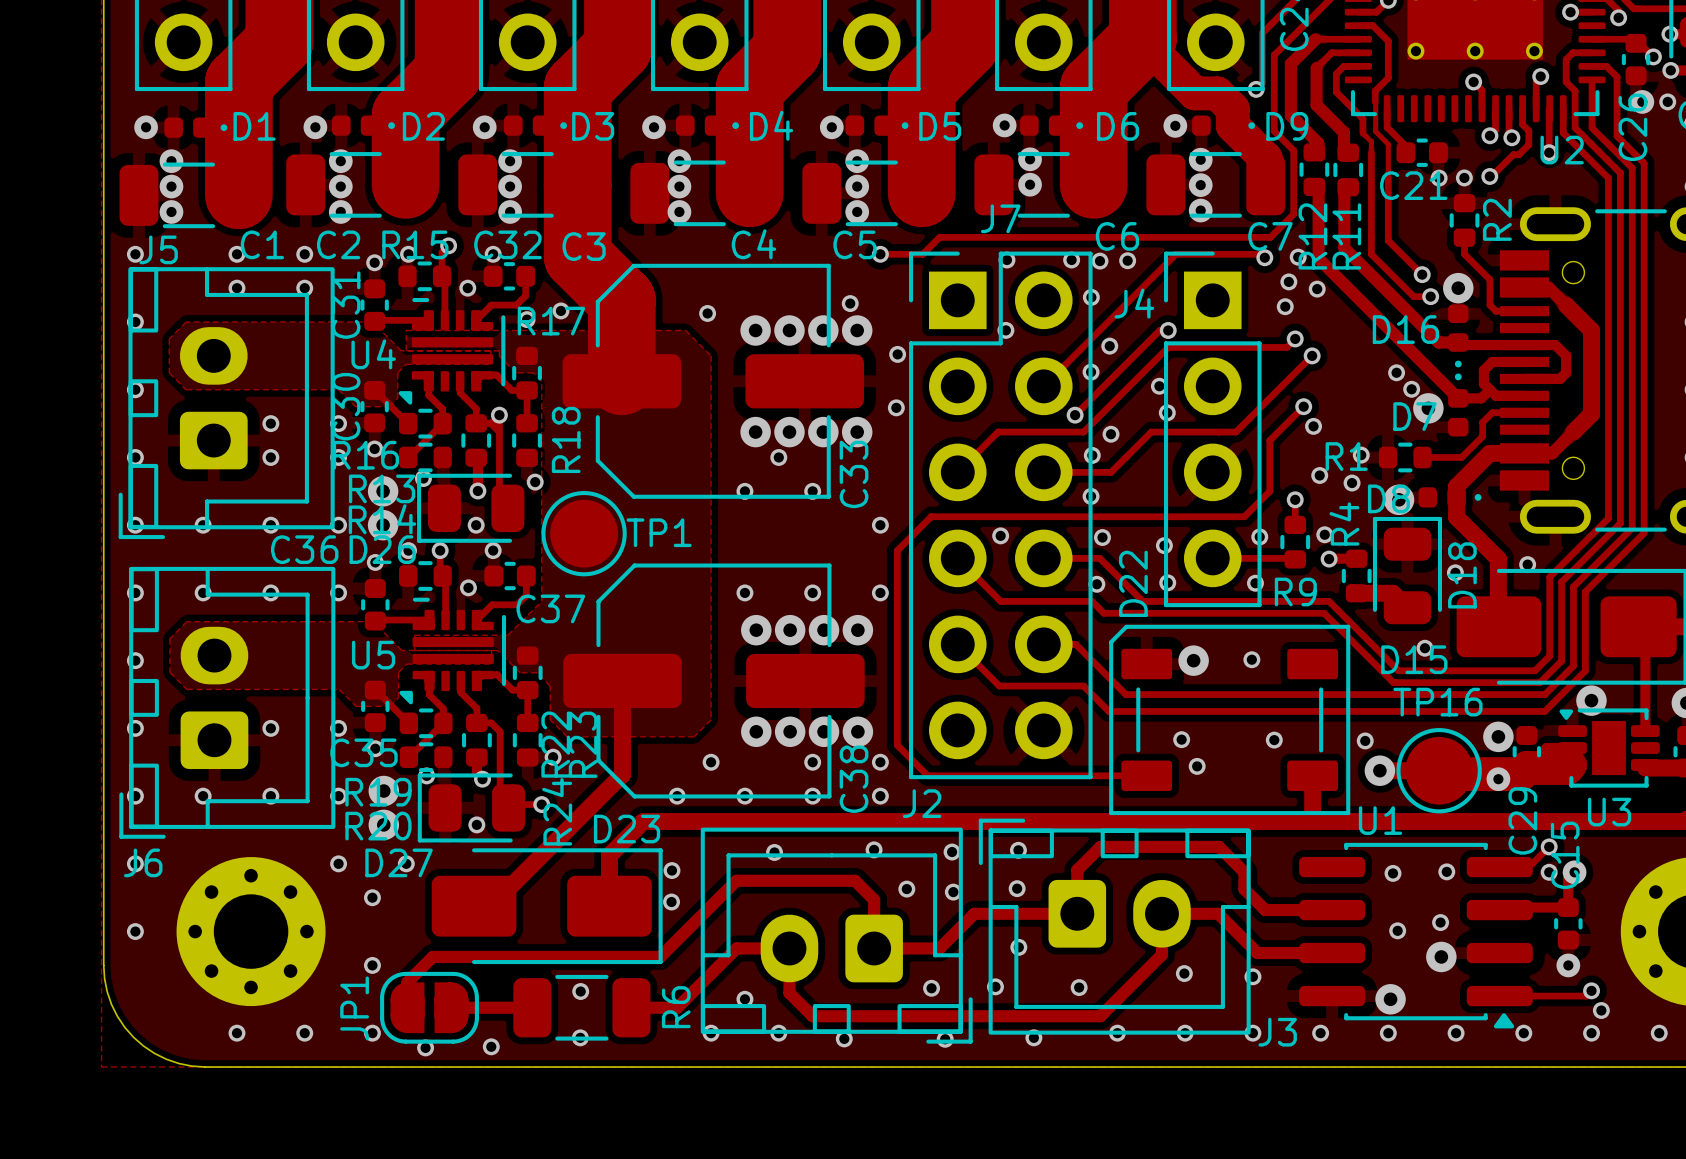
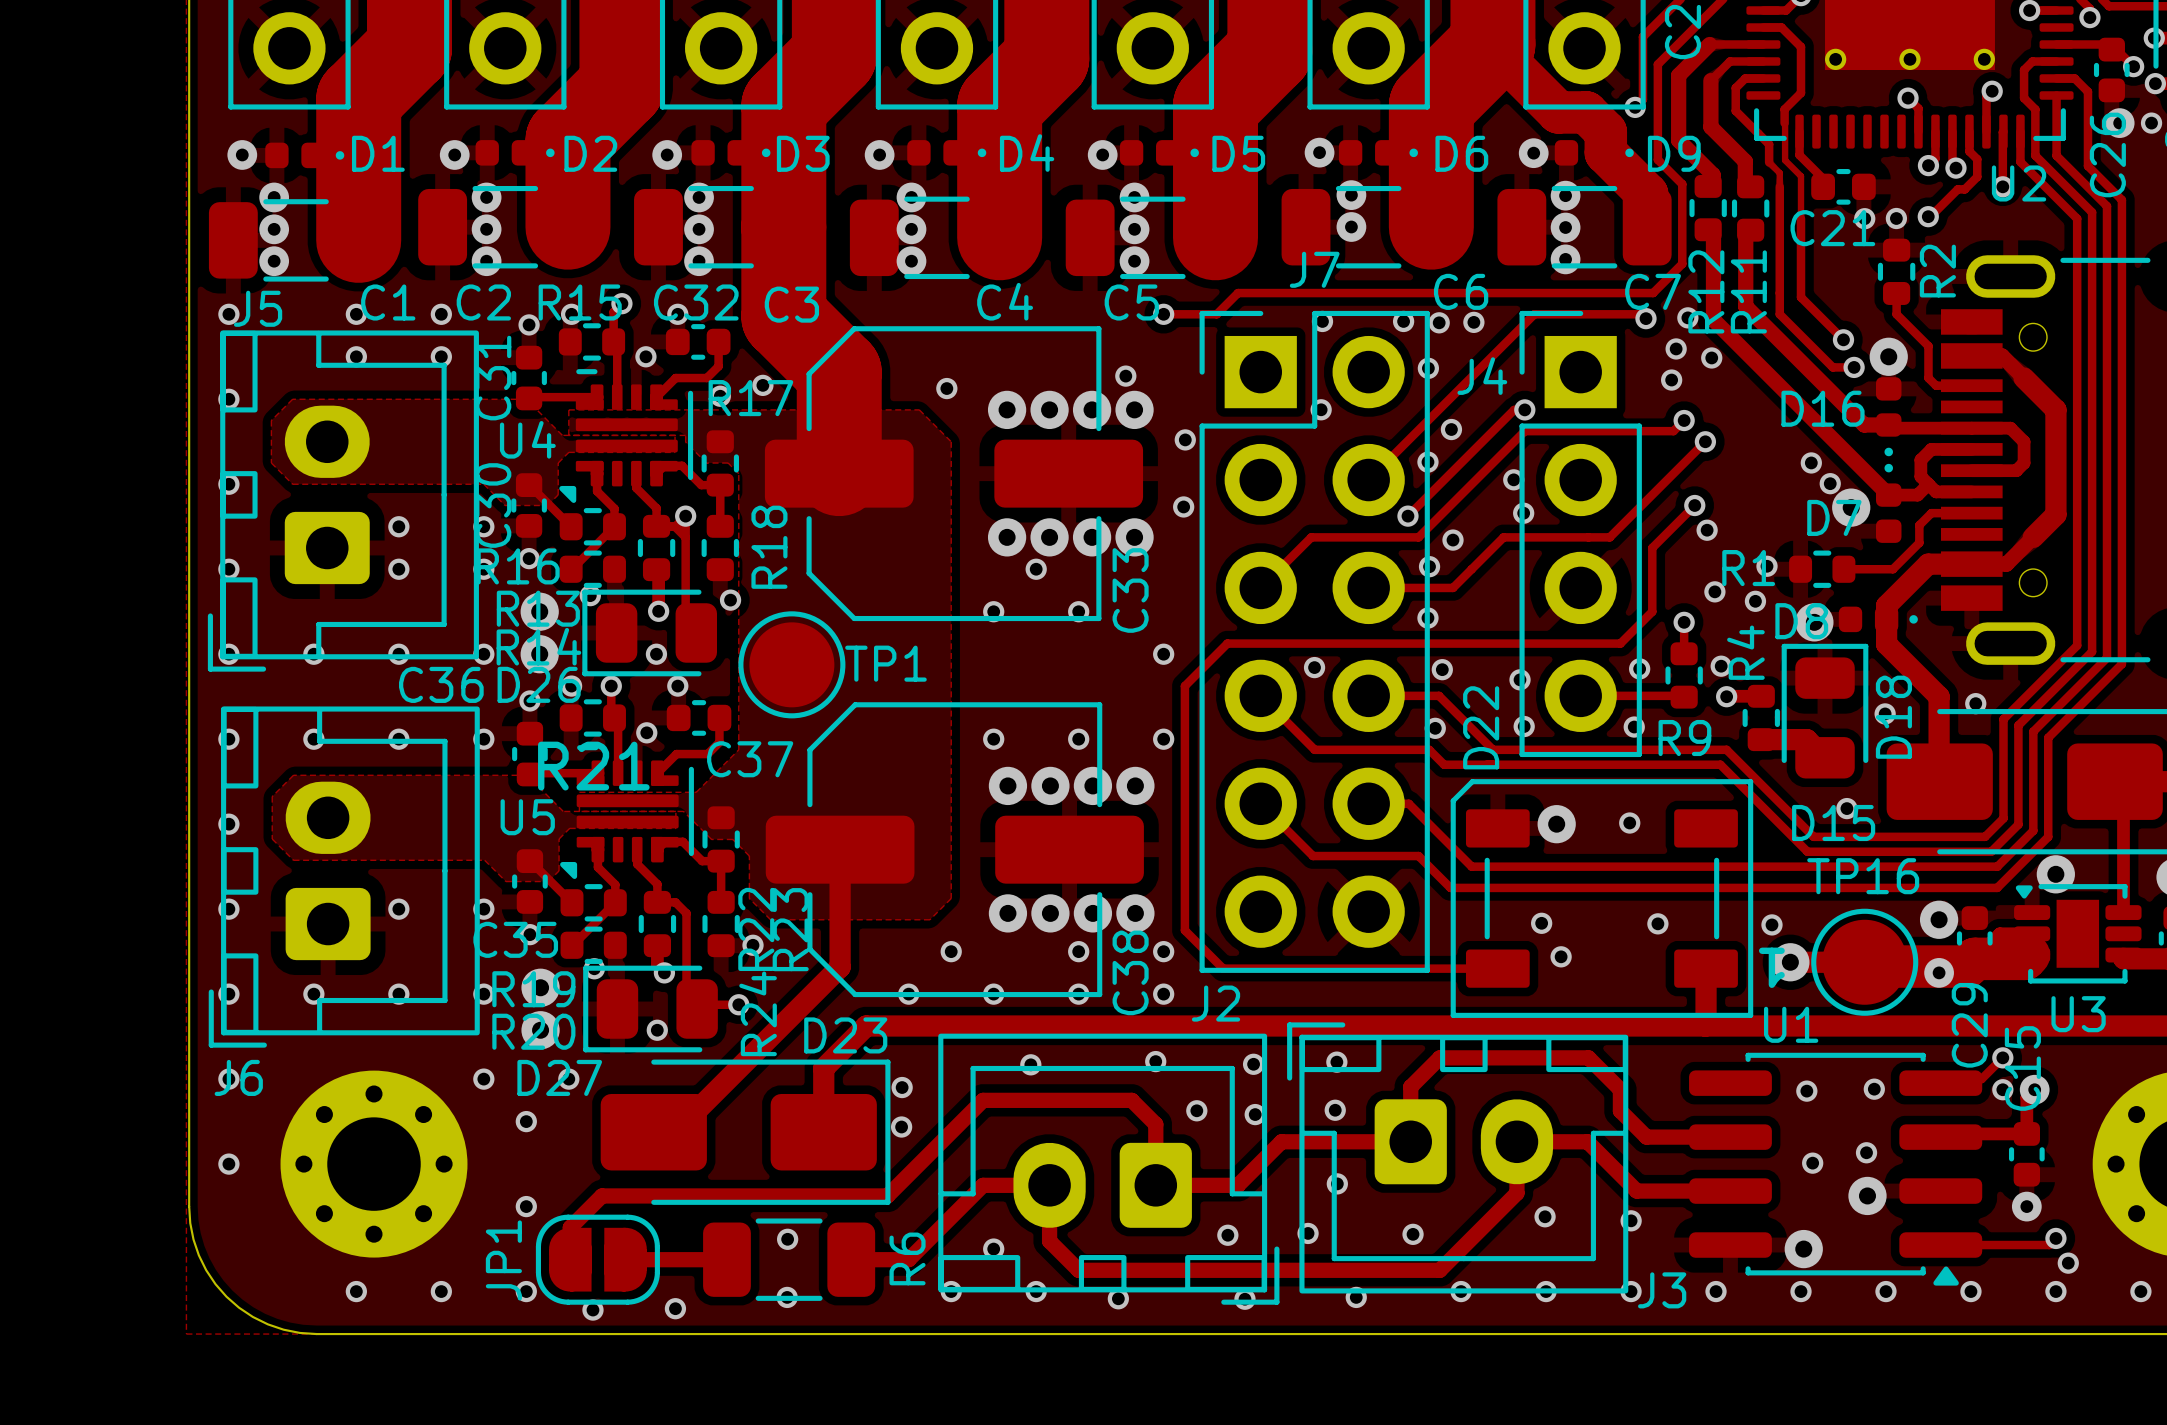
R21 name: none -> R21 (593, 766)
D22 text: none -> 1 (1771, 967)

